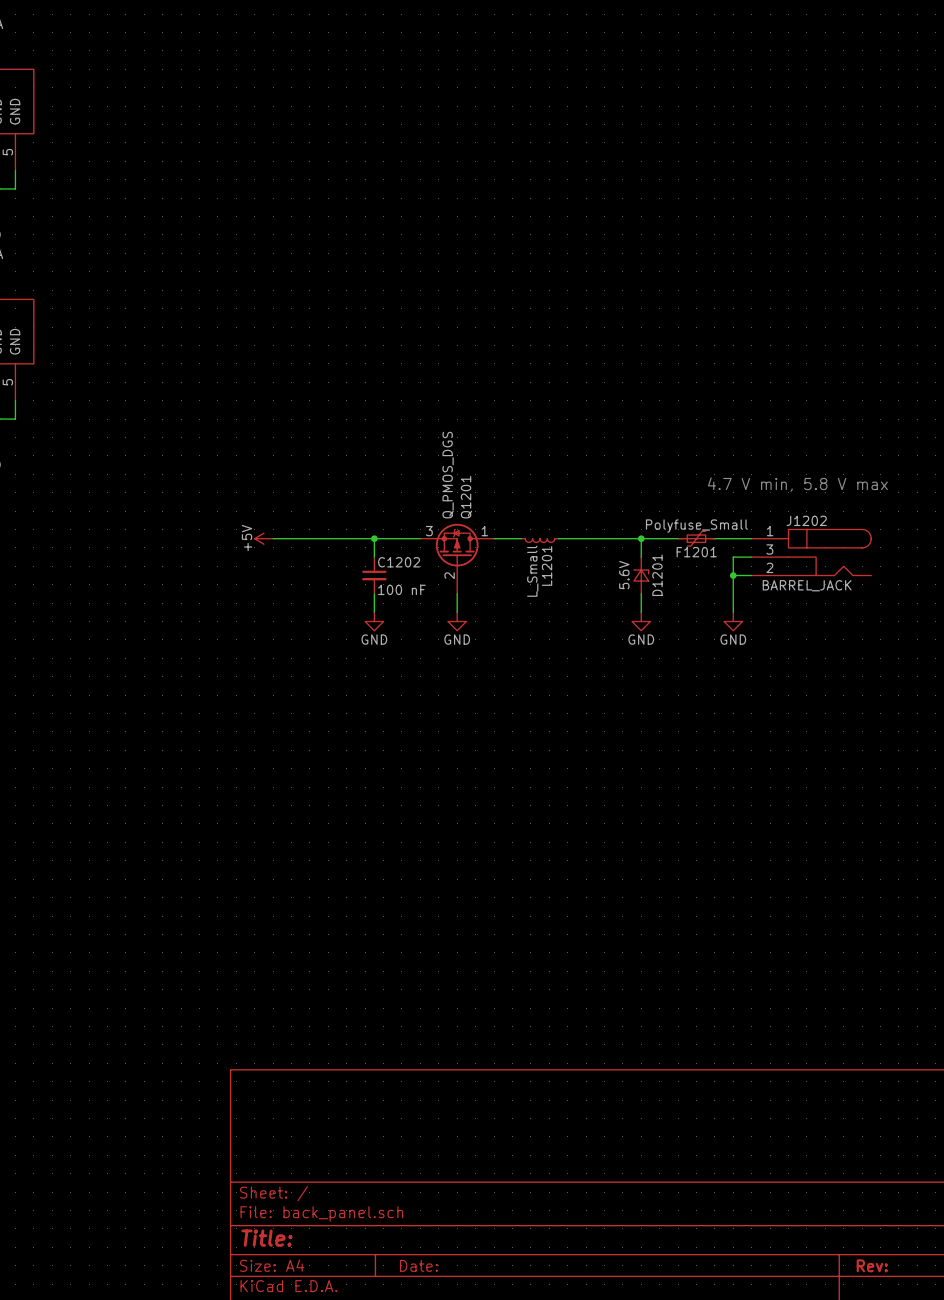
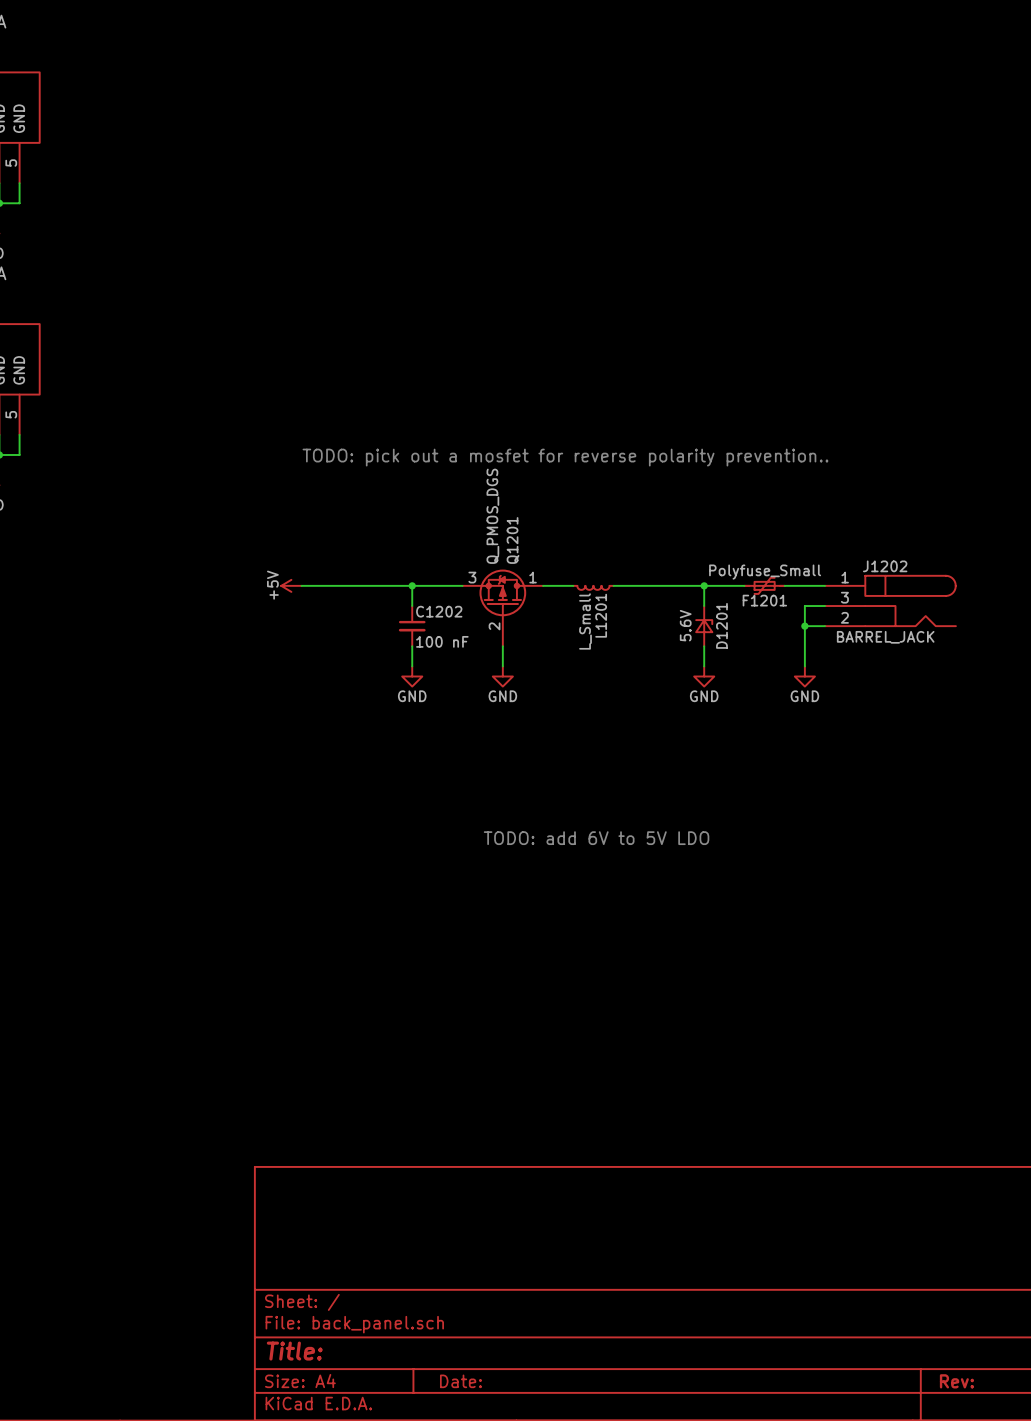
text: none -> TODO: pick out a mosfet for reverse polarity prevention.. (565, 457)
text: 4.7 V min, 5.8 V max (797, 484) -> none
text: none -> TODO: add 6V to 5V LDO (596, 838)

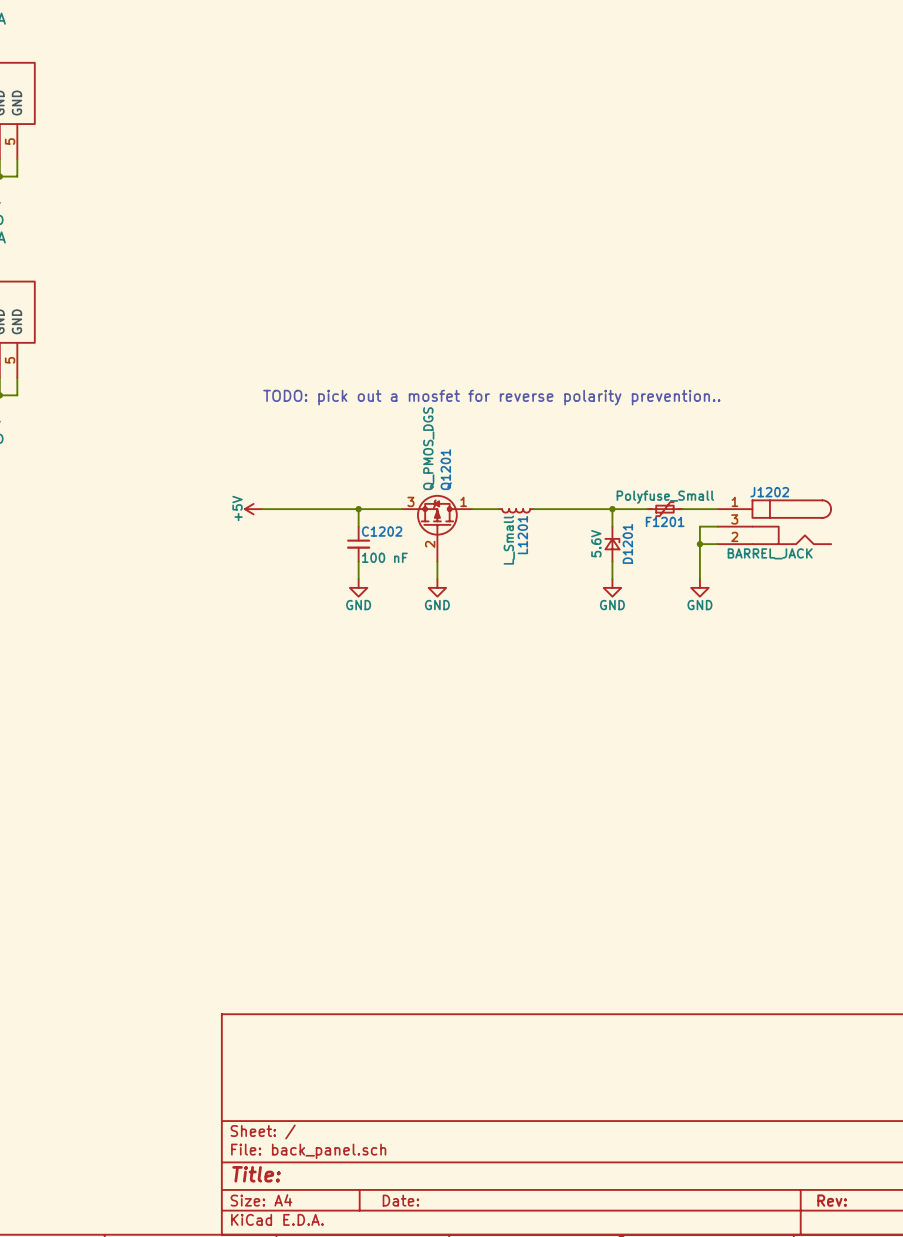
text: TODO: add 6V to 5V LDO (596, 838) -> none

